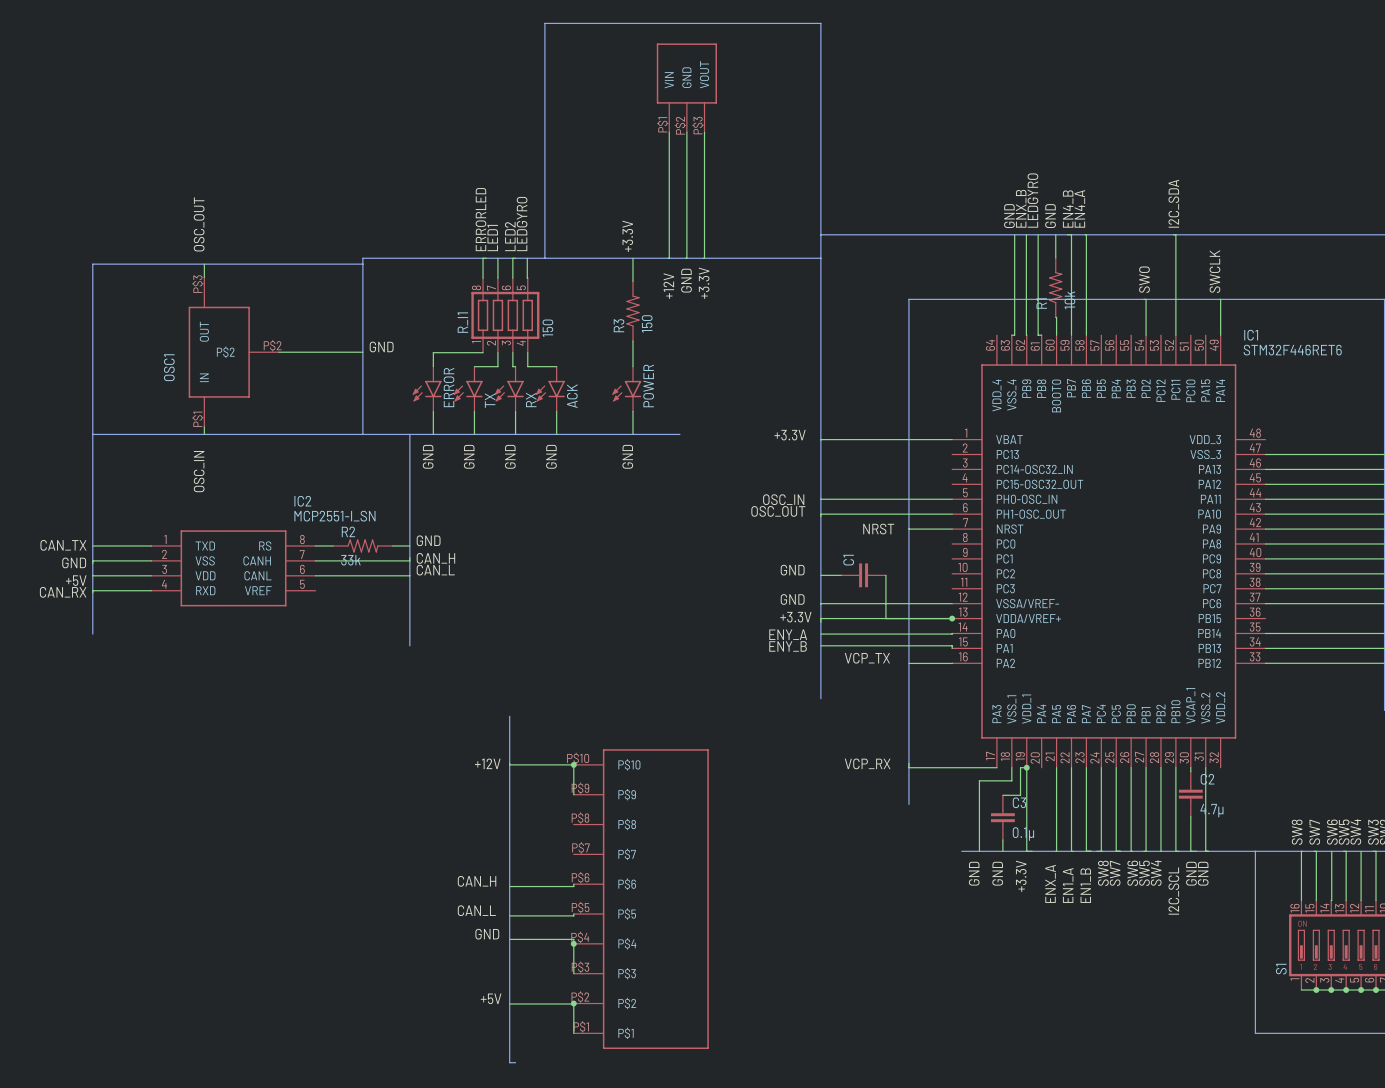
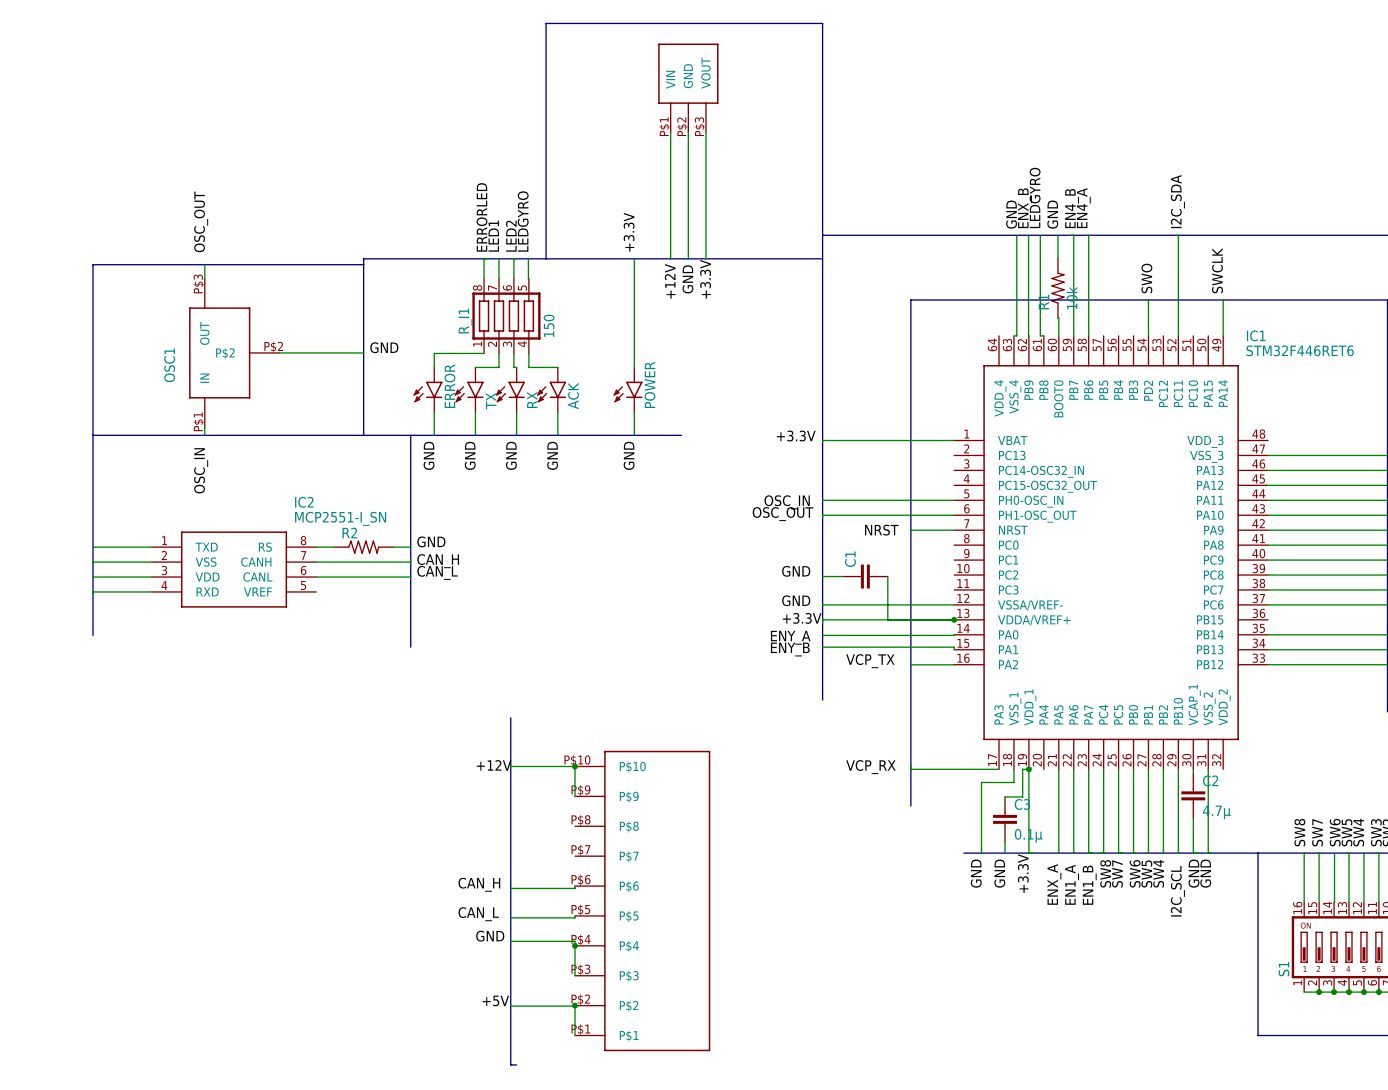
R3: 150 (632, 311) -> none
label: CAN_TX (63, 545) -> none
R2 value: 33k (350, 560) -> none
label: GND (74, 562) -> none
label: +5V (76, 580) -> none
label: CAN_RX (63, 592) -> none

